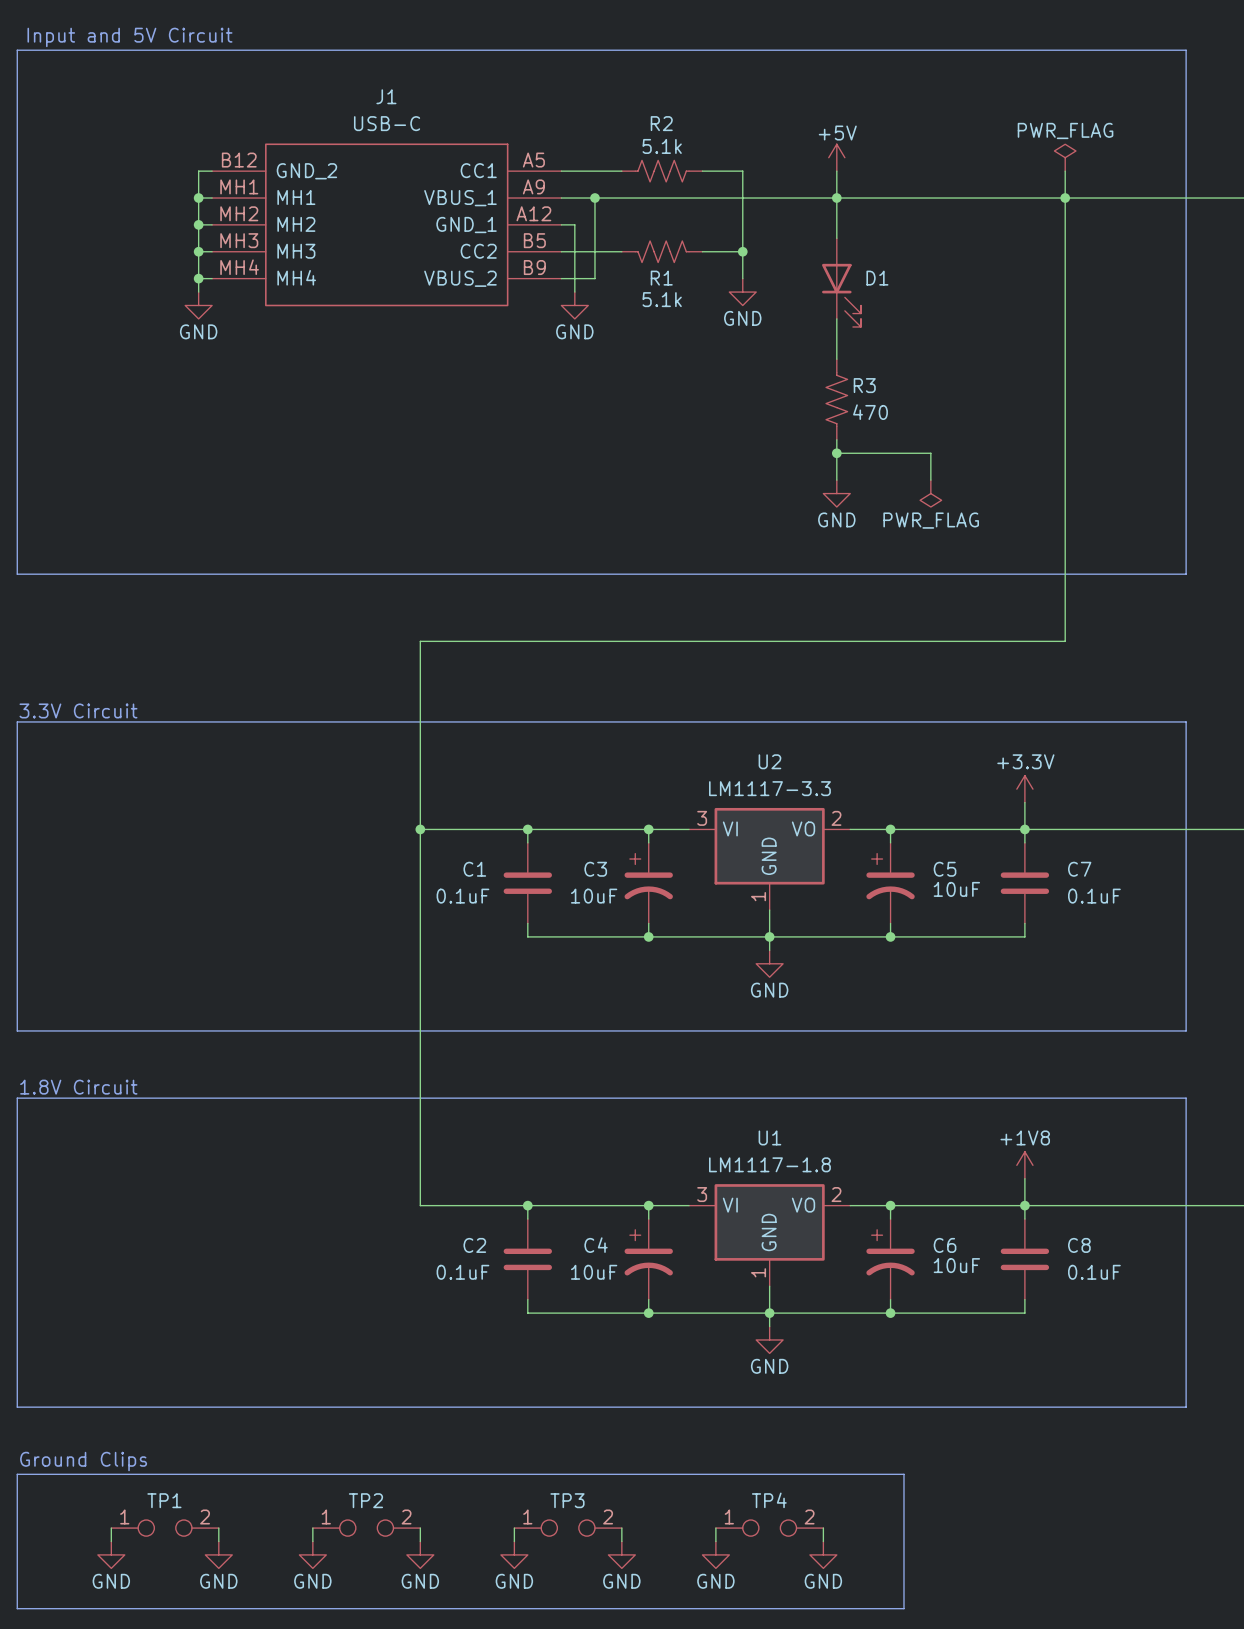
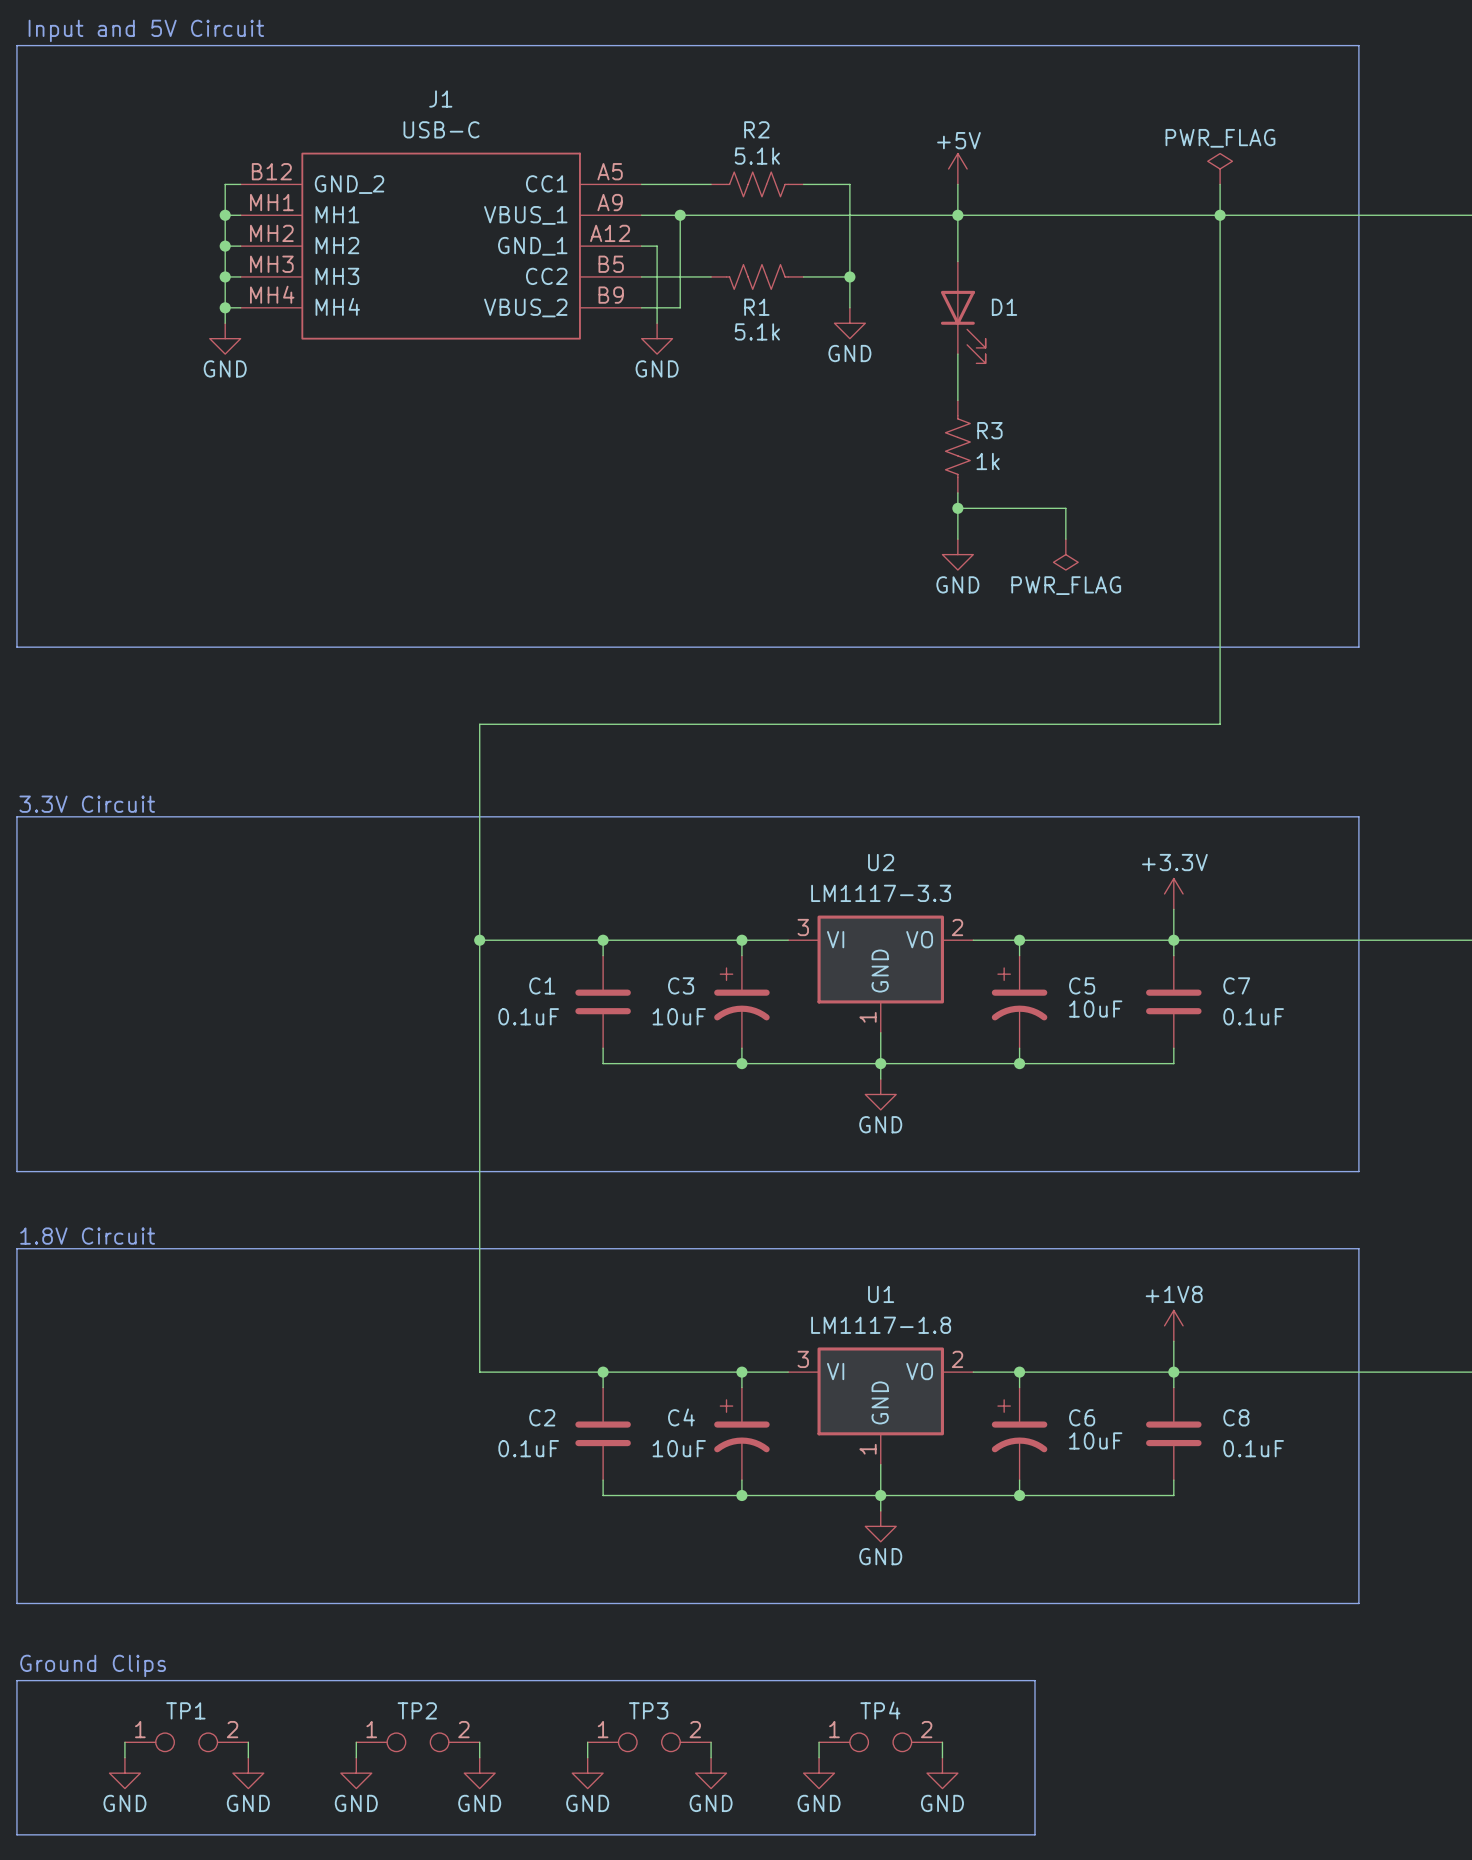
R3 value: 470 (870, 412) -> 1k (988, 461)

